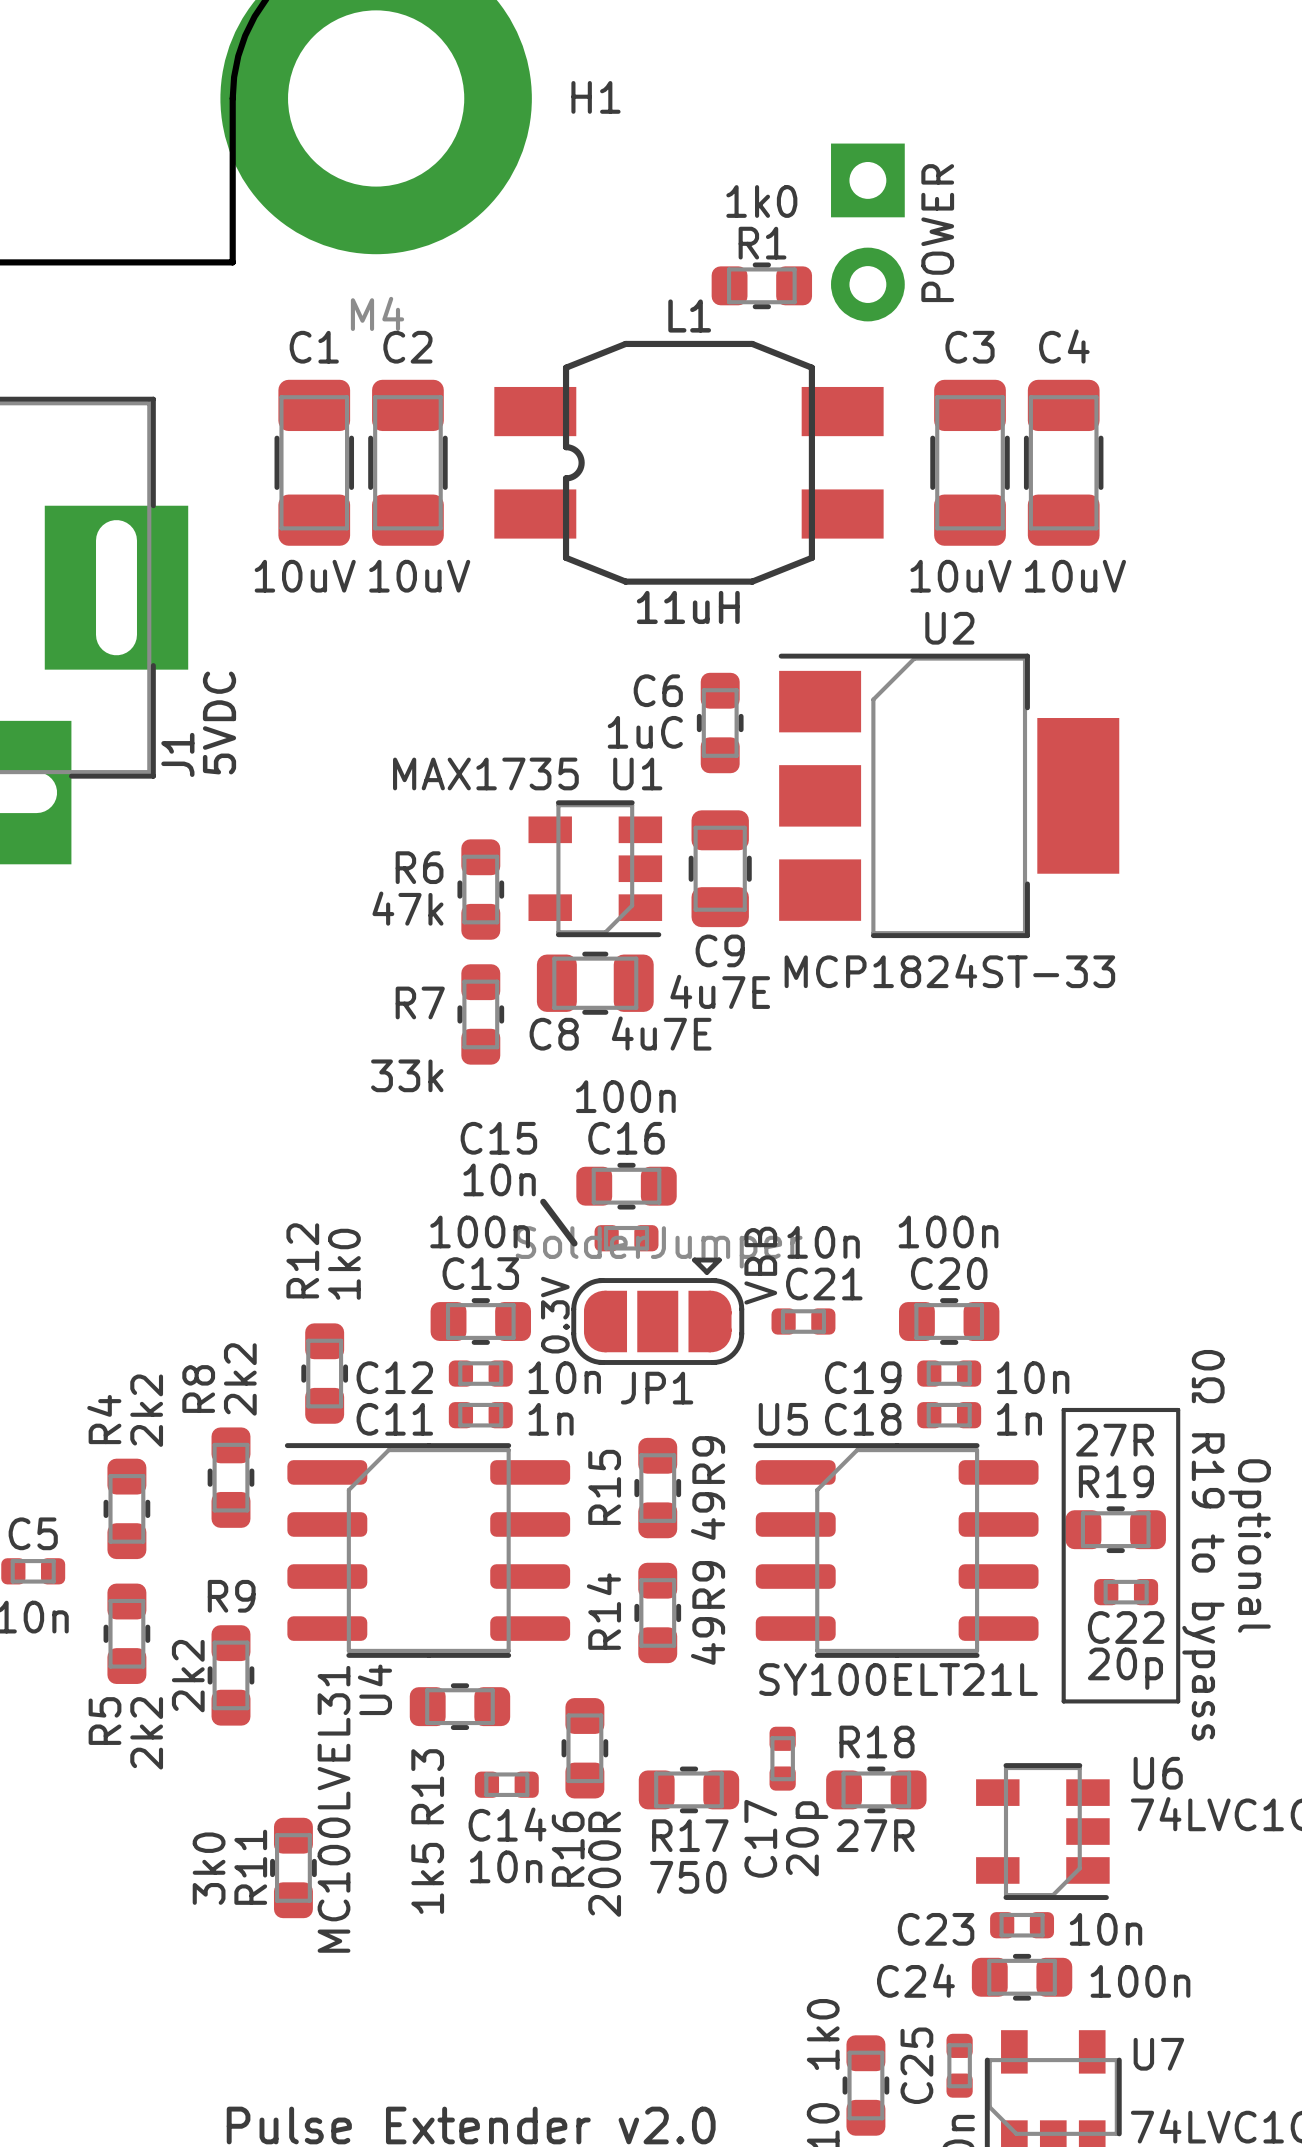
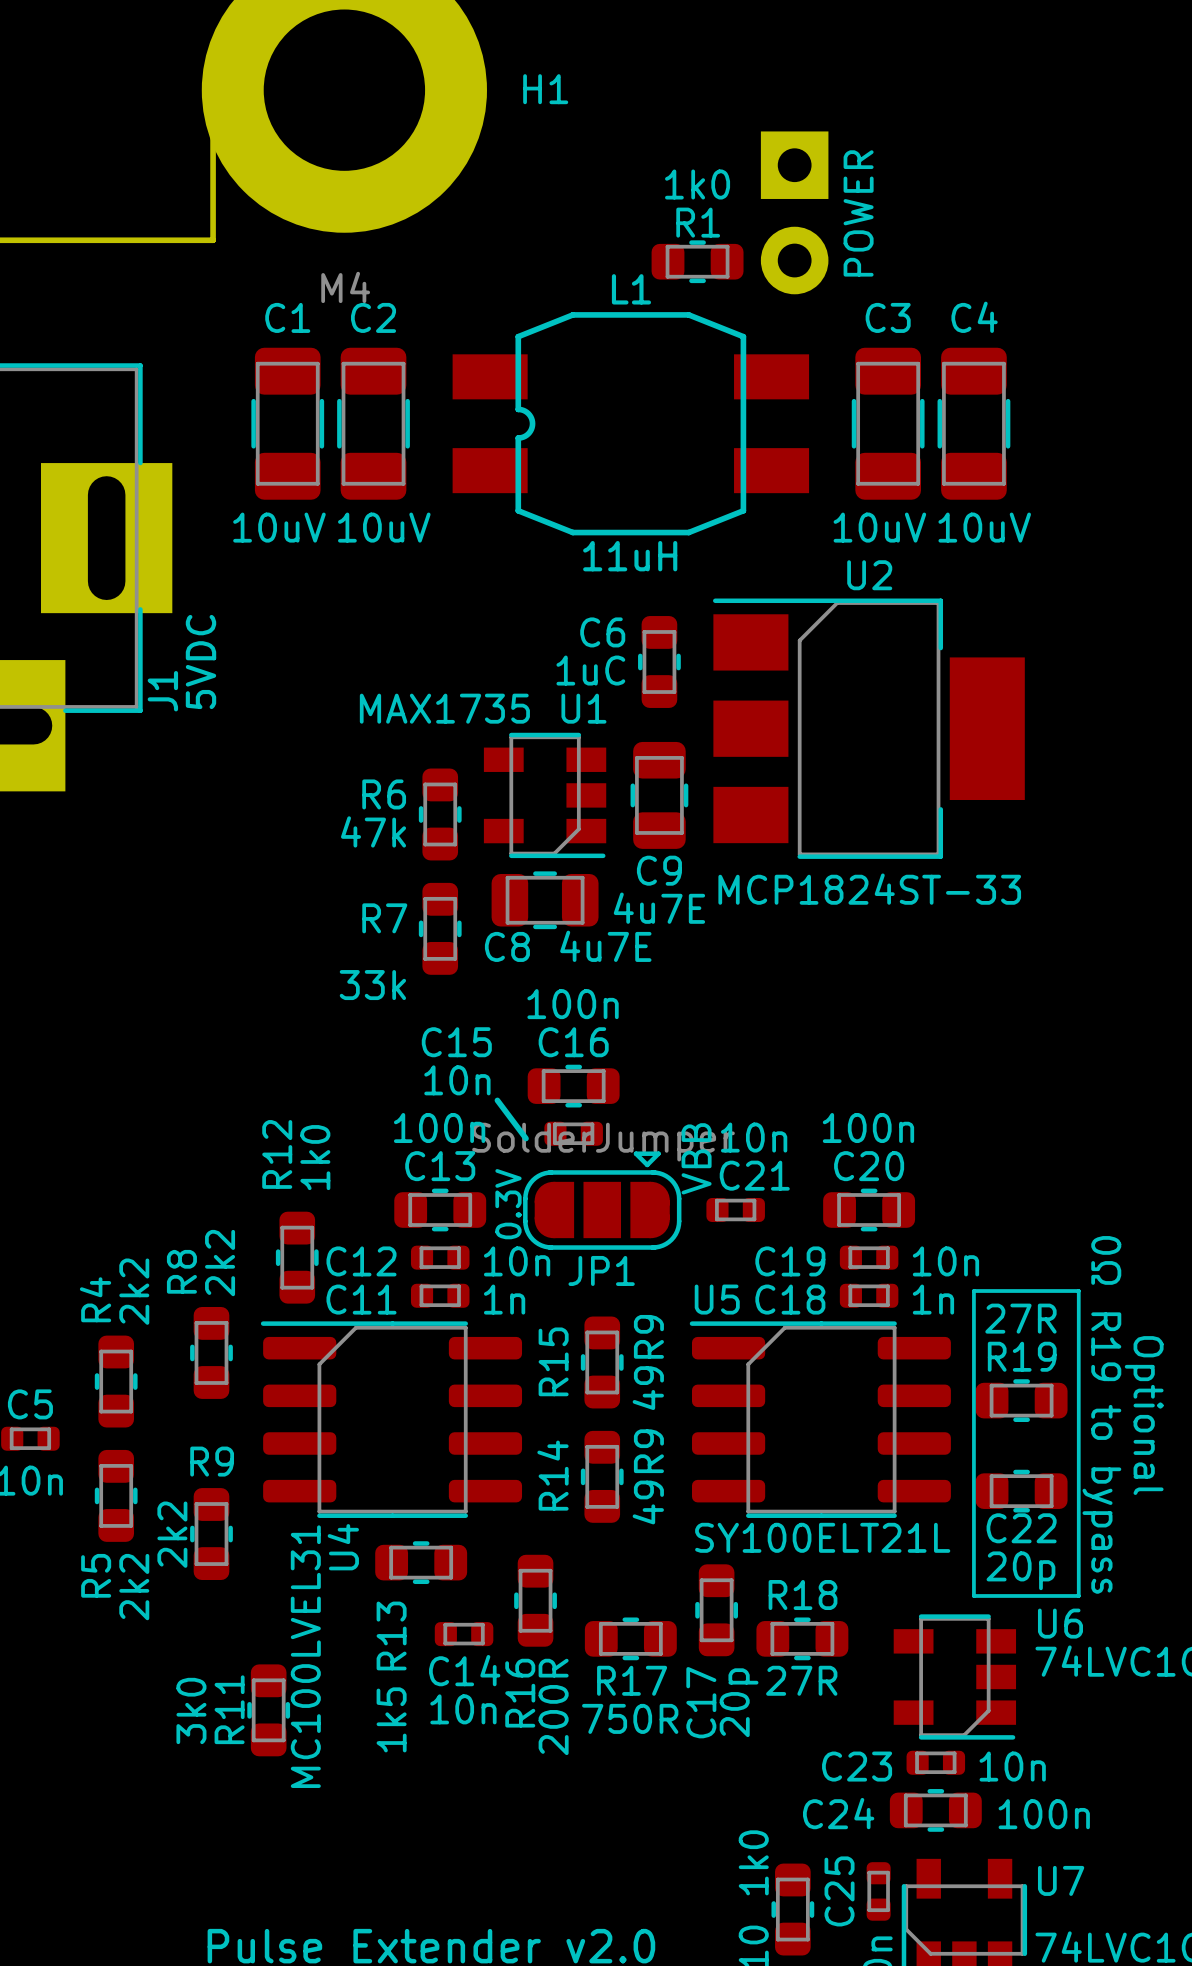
C22 footprint: [1094, 1579, 1159, 1606] -> [975, 1469, 1068, 1513]
line: (1063, 1701) (1178, 1701) -> (973, 1557) (973, 1595) (1078, 1595) (1078, 1557)
C17 footprint: [769, 1726, 796, 1791] -> [695, 1564, 739, 1657]
R17 value: 750 (688, 1877) -> 750R (630, 1718)

